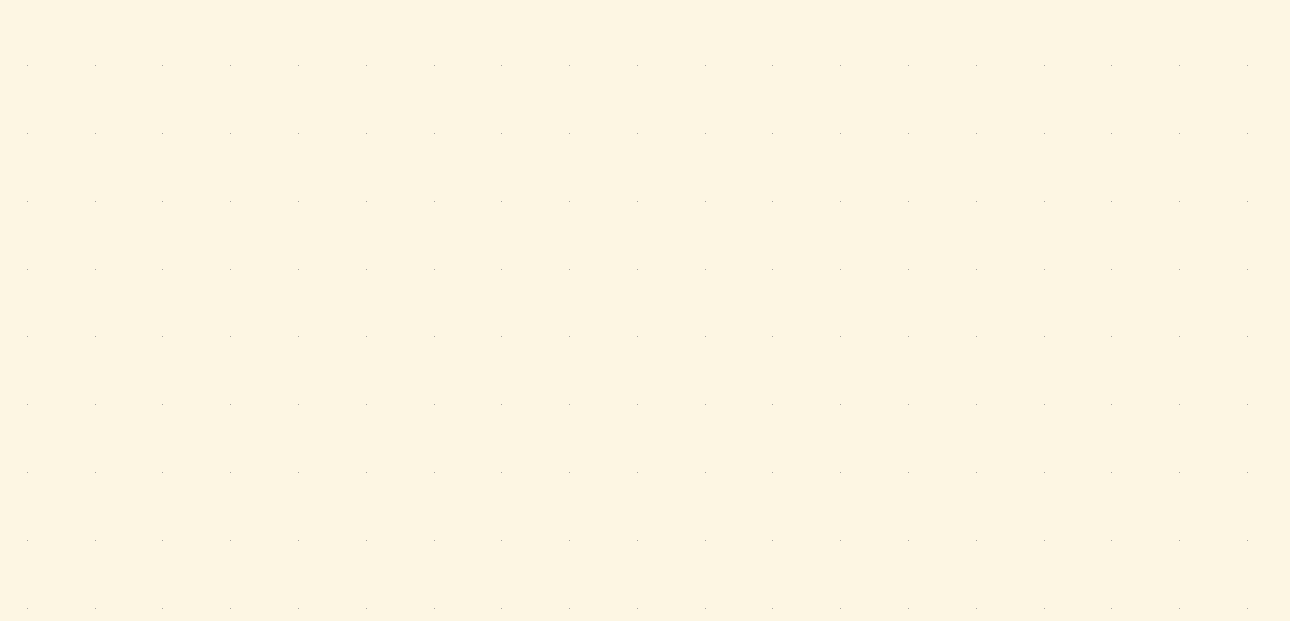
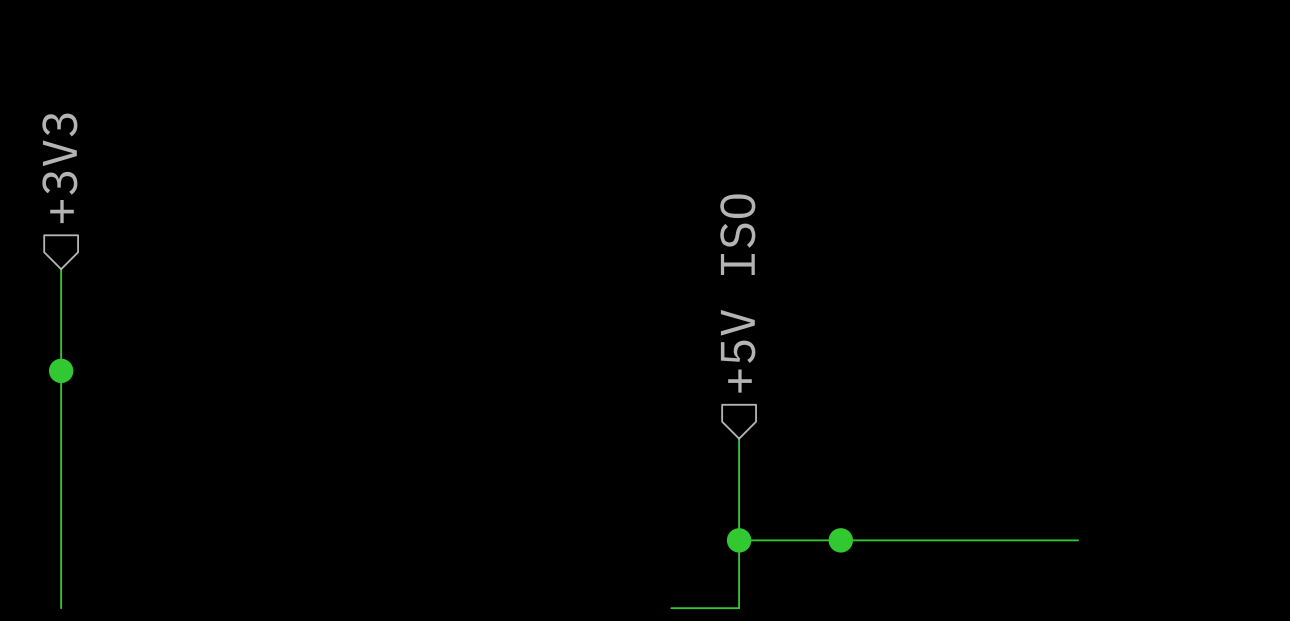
hierarchical label: none -> +3V3 (59, 168)
wire: none -> (61, 269) (61, 608)
hierarchical label: none -> +5V ISO (737, 293)
junction: none -> (61, 370)
wire: none -> (739, 438) (739, 608) (671, 608)
wire: none -> (739, 540) (1078, 540)
junction: none -> (739, 540)
junction: none -> (840, 540)

